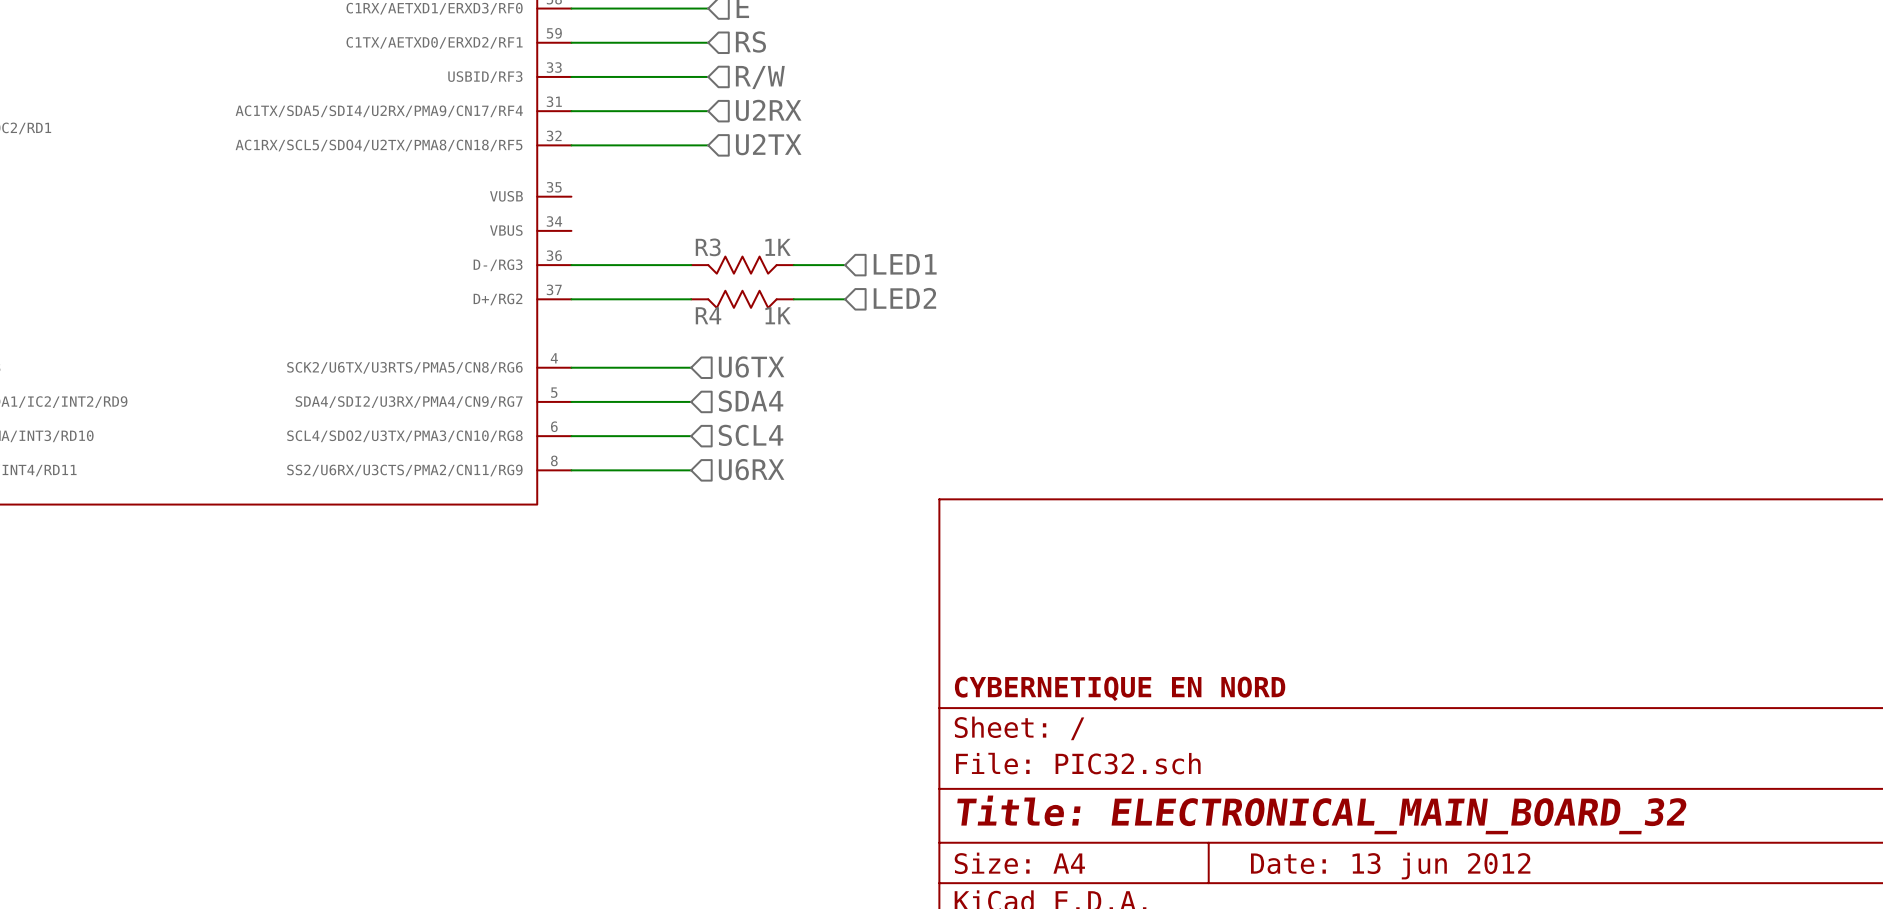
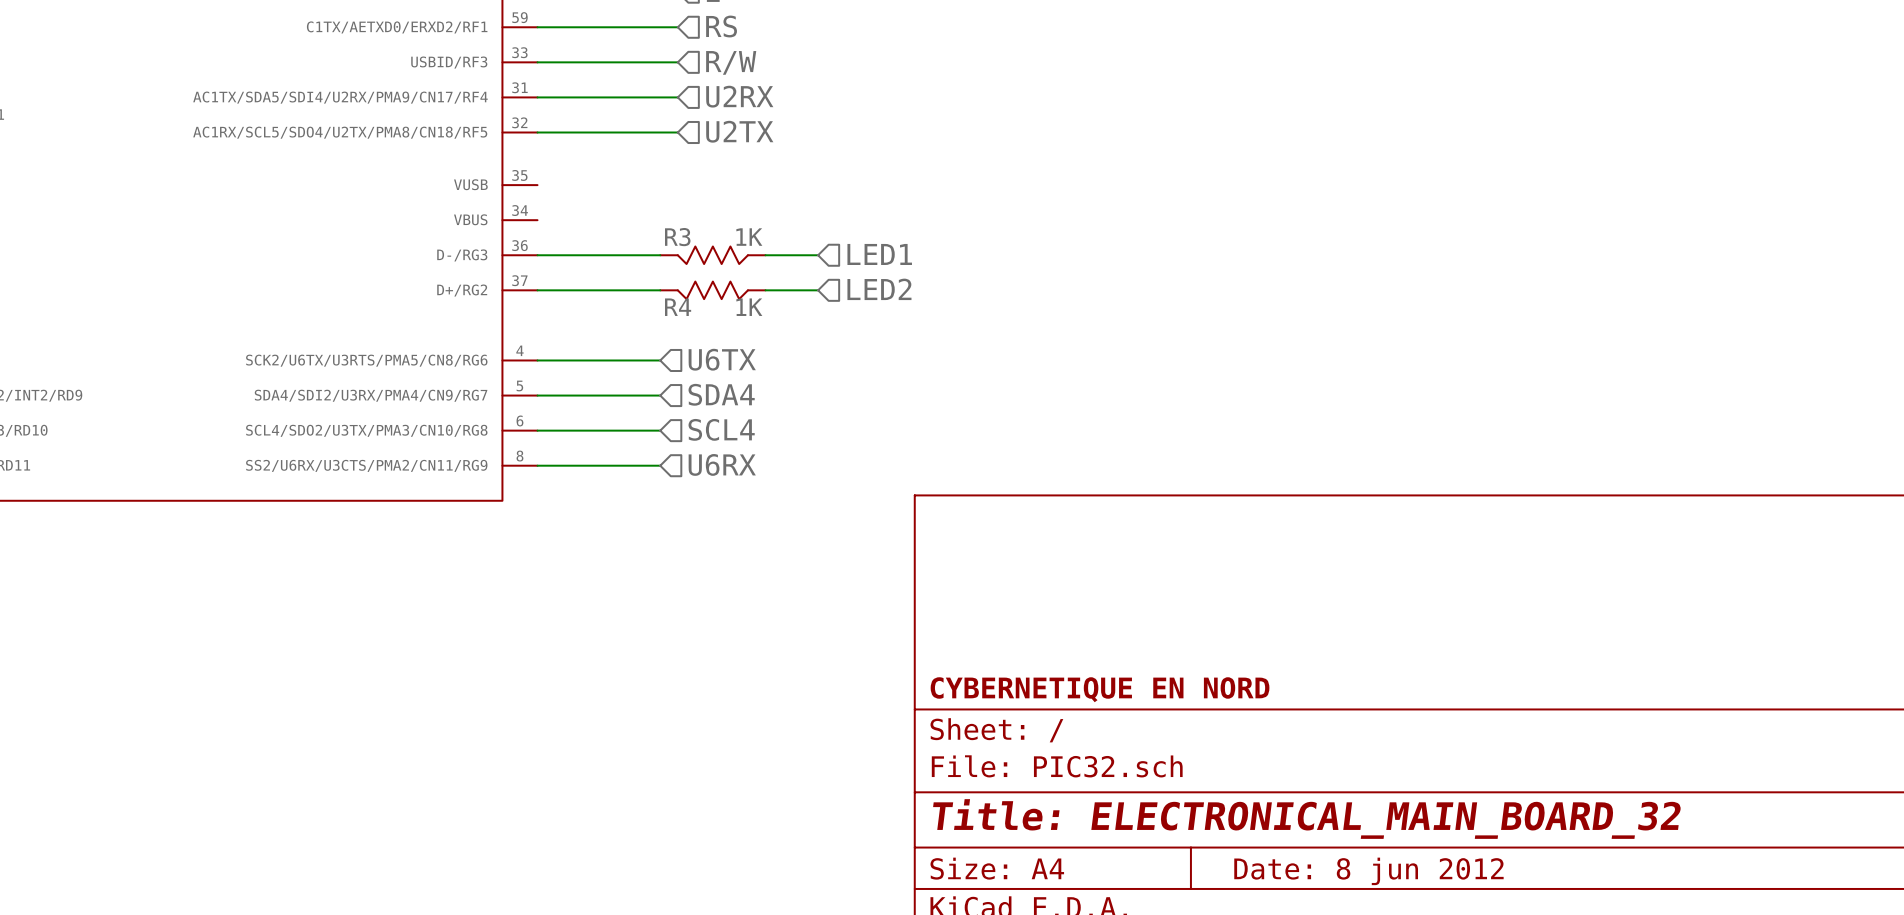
title block: Date: 13 jun 2012 (1390, 866) -> Date: 8 jun 2012 (1368, 871)

